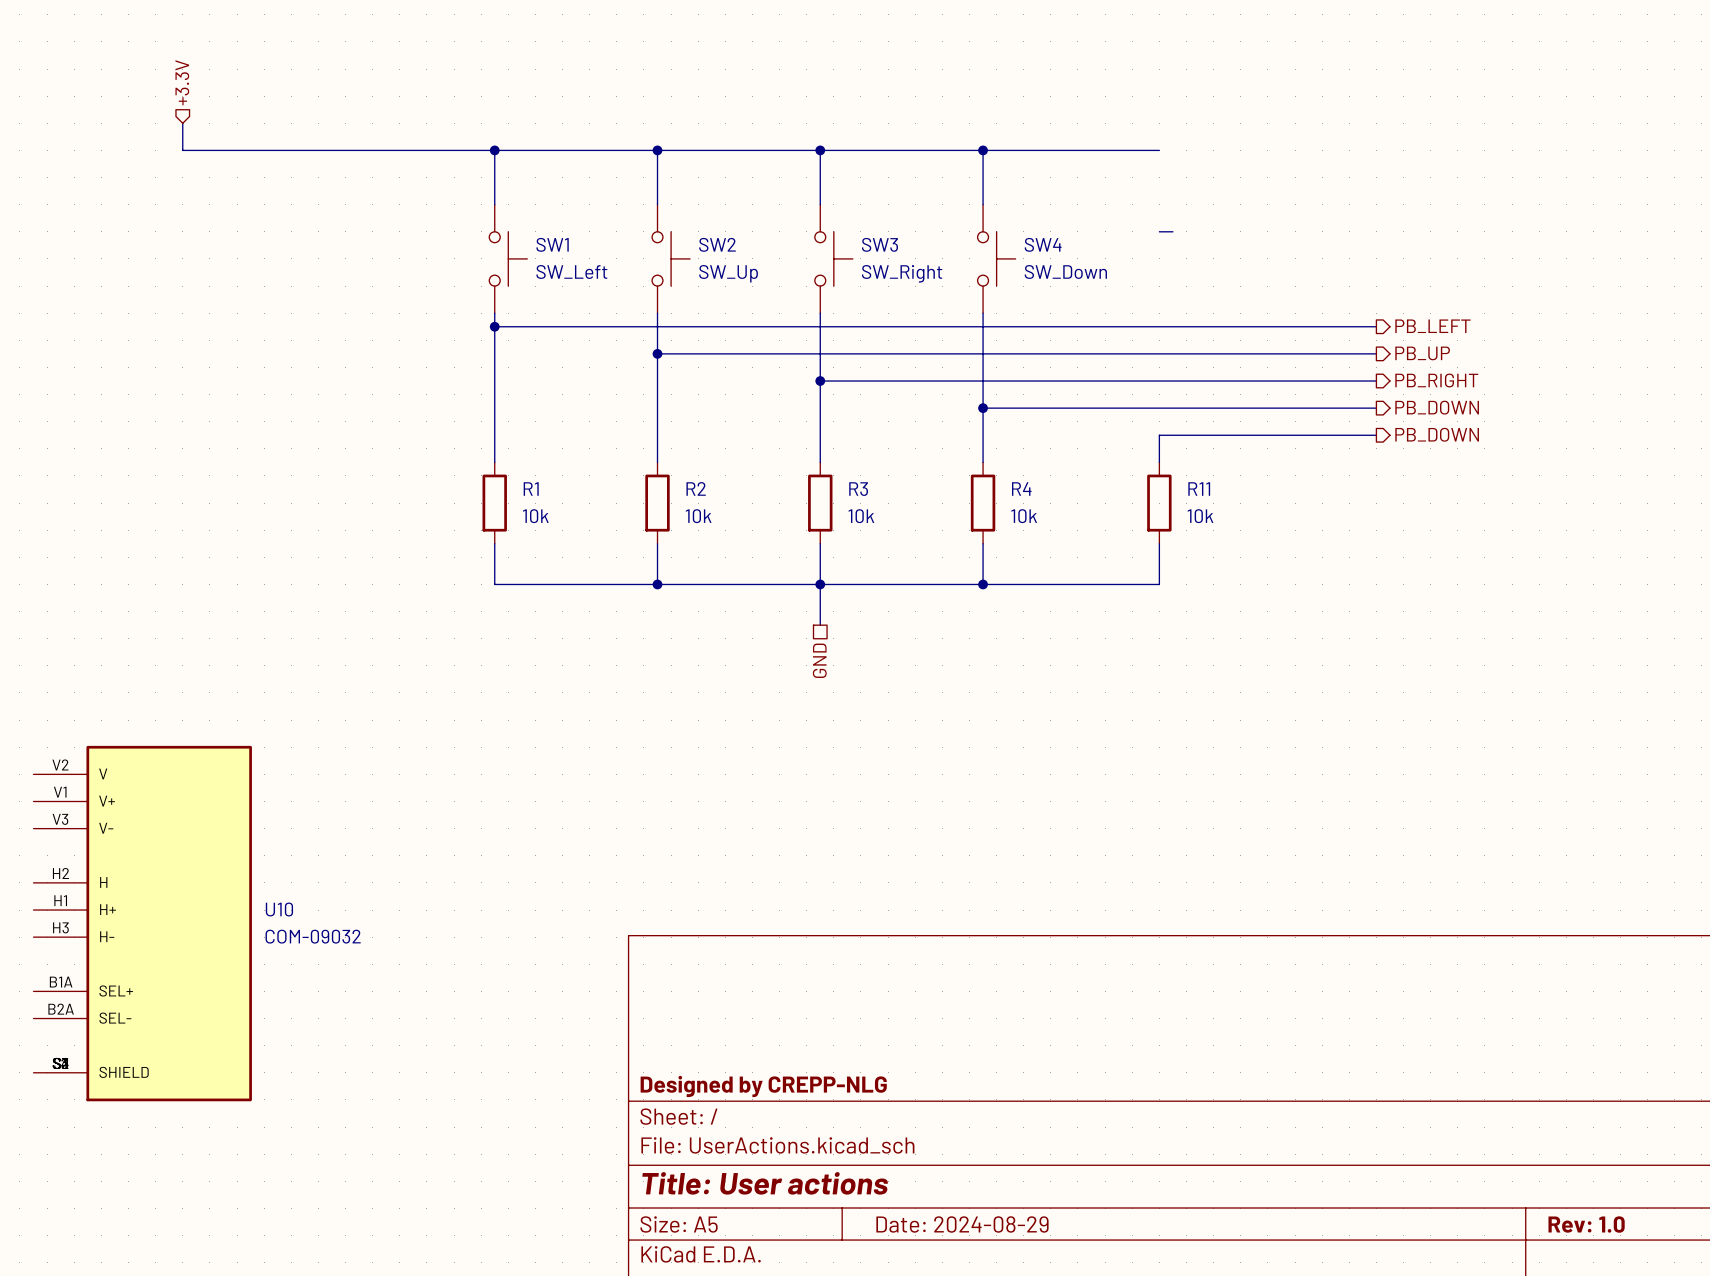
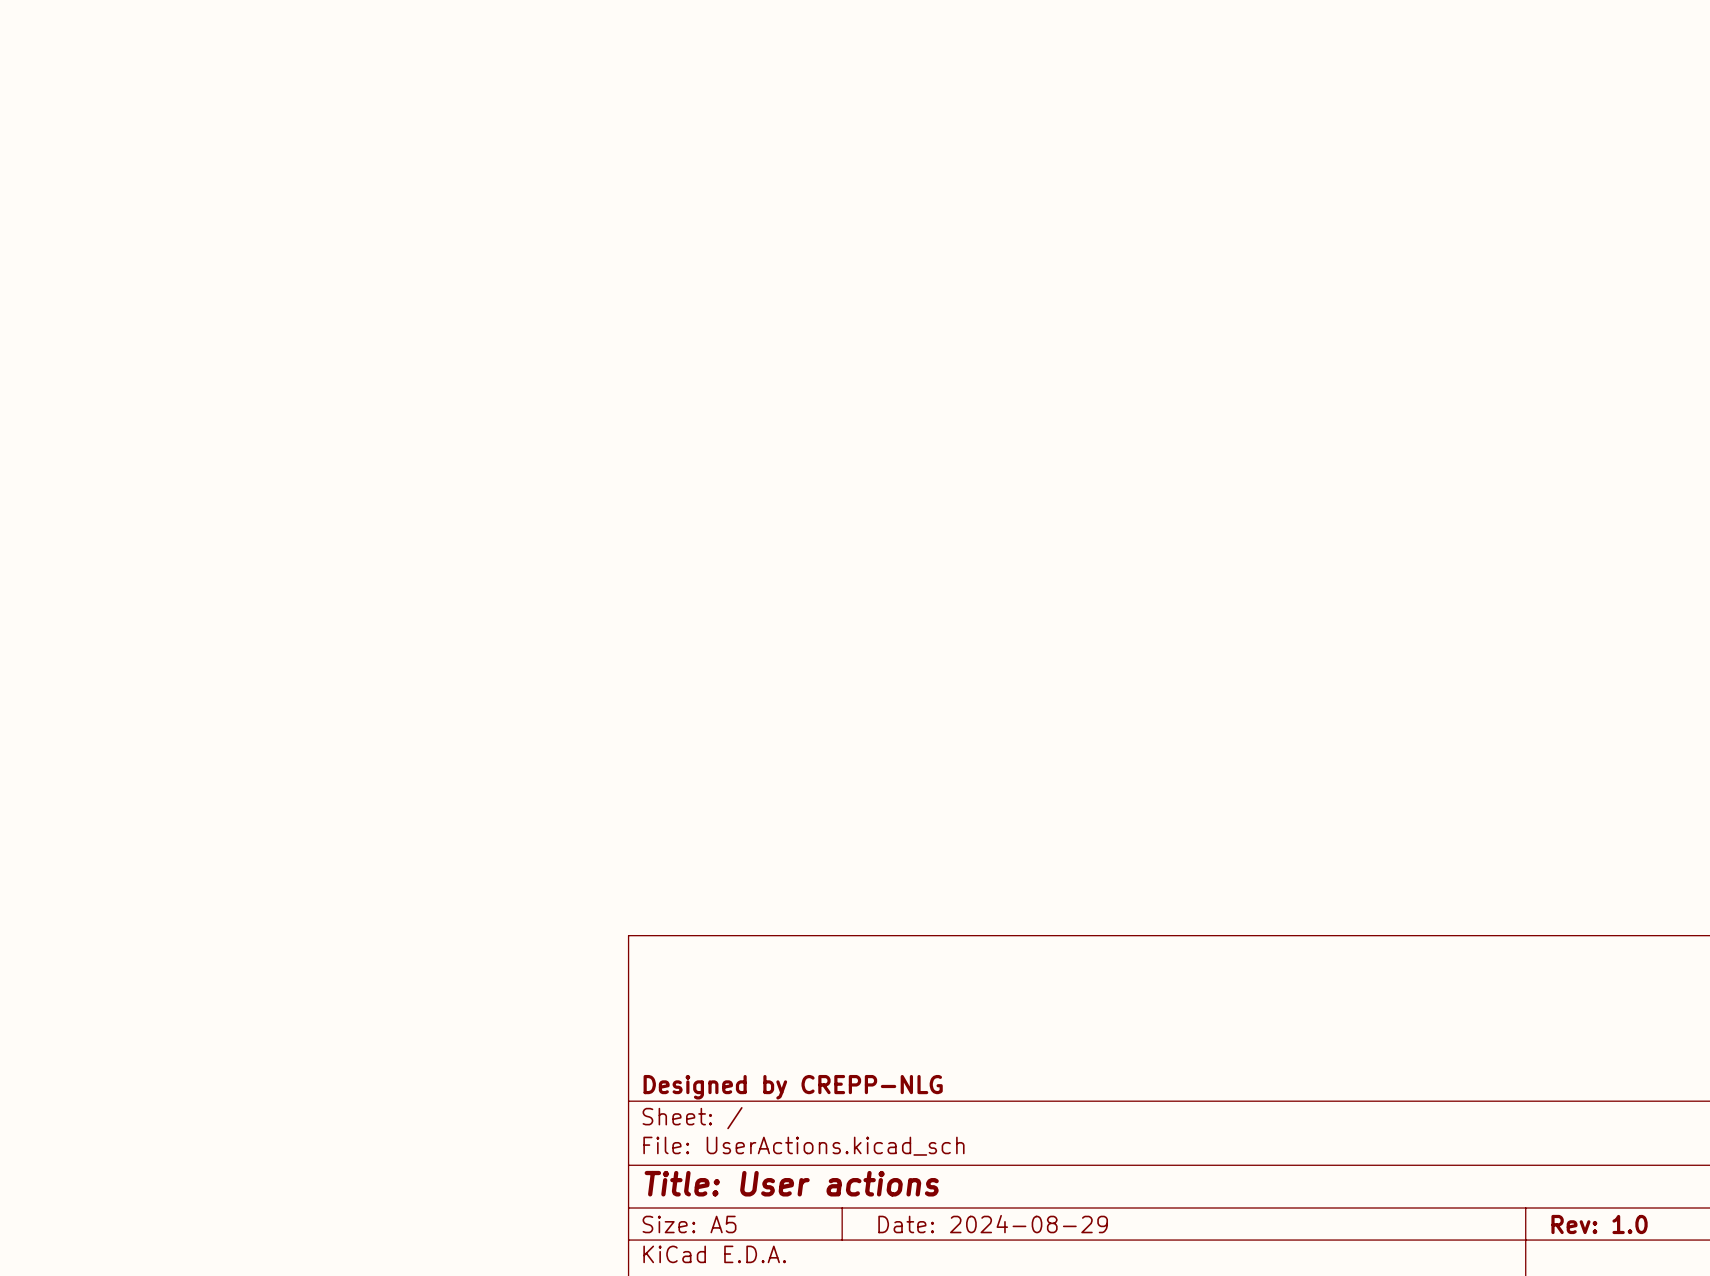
hierarchical label: +3.3V (182, 82) -> none
wire: (182, 123) (182, 150) (1159, 150) -> none
wire: (494, 150) (494, 204) -> none
junction: (494, 150) -> none
wire: (657, 150) (657, 204) -> none
junction: (657, 150) -> none
wire: (820, 150) (820, 204) -> none
junction: (820, 150) -> none
wire: (983, 150) (983, 204) -> none
junction: (983, 150) -> none
wire: (1159, 231) (1172, 231) -> none
SW1: SW_Left (508, 258) -> none
SW2: SW_Up (671, 258) -> none
SW3: SW_Right (833, 258) -> none
SW4: SW_Down (996, 258) -> none
wire: (494, 313) (494, 462) -> none
wire: (657, 313) (657, 462) -> none
wire: (820, 313) (820, 462) -> none
wire: (983, 313) (983, 462) -> none
wire: (494, 326) (1376, 326) -> none
junction: (494, 326) -> none
hierarchical label: PB_LEFT (1432, 326) -> none
wire: (657, 353) (1376, 353) -> none
junction: (657, 353) -> none
hierarchical label: PB_UP (1422, 353) -> none
hierarchical label: PB_RIGHT (1436, 380) -> none
wire: (820, 381) (1376, 381) -> none
junction: (820, 381) -> none
hierarchical label: PB_DOWN (1437, 407) -> none
wire: (983, 408) (1376, 408) -> none
junction: (983, 408) -> none
hierarchical label: PB_DOWN (1437, 434) -> none
wire: (1376, 435) (1159, 435) (1159, 462) -> none
R1: 10k (494, 503) -> none
R2: 10k (657, 503) -> none
R3: 10k (820, 503) -> none
R4: 10k (983, 503) -> none
R11: 10k (1159, 503) -> none
wire: (494, 543) (494, 584) (1159, 584) (1159, 543) -> none
wire: (657, 543) (657, 584) -> none
wire: (820, 543) (820, 625) -> none
wire: (983, 543) (983, 584) -> none
junction: (657, 584) -> none
junction: (820, 584) -> none
junction: (983, 584) -> none
hierarchical label: GND (819, 660) -> none
U10: COM-09032 (142, 923) -> none

